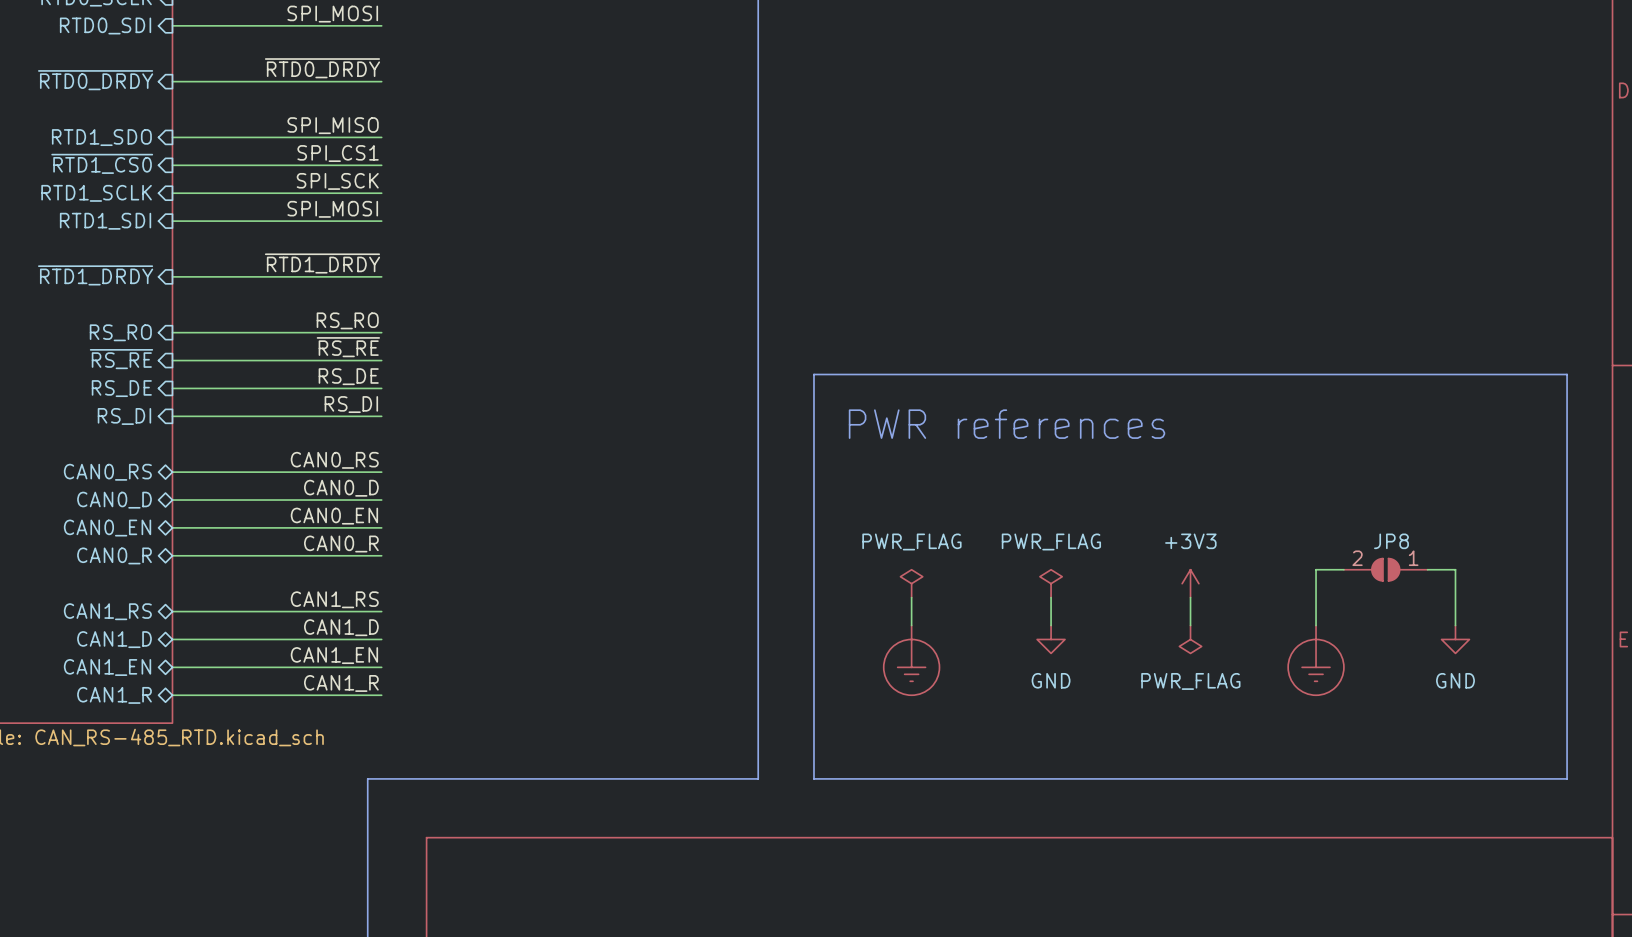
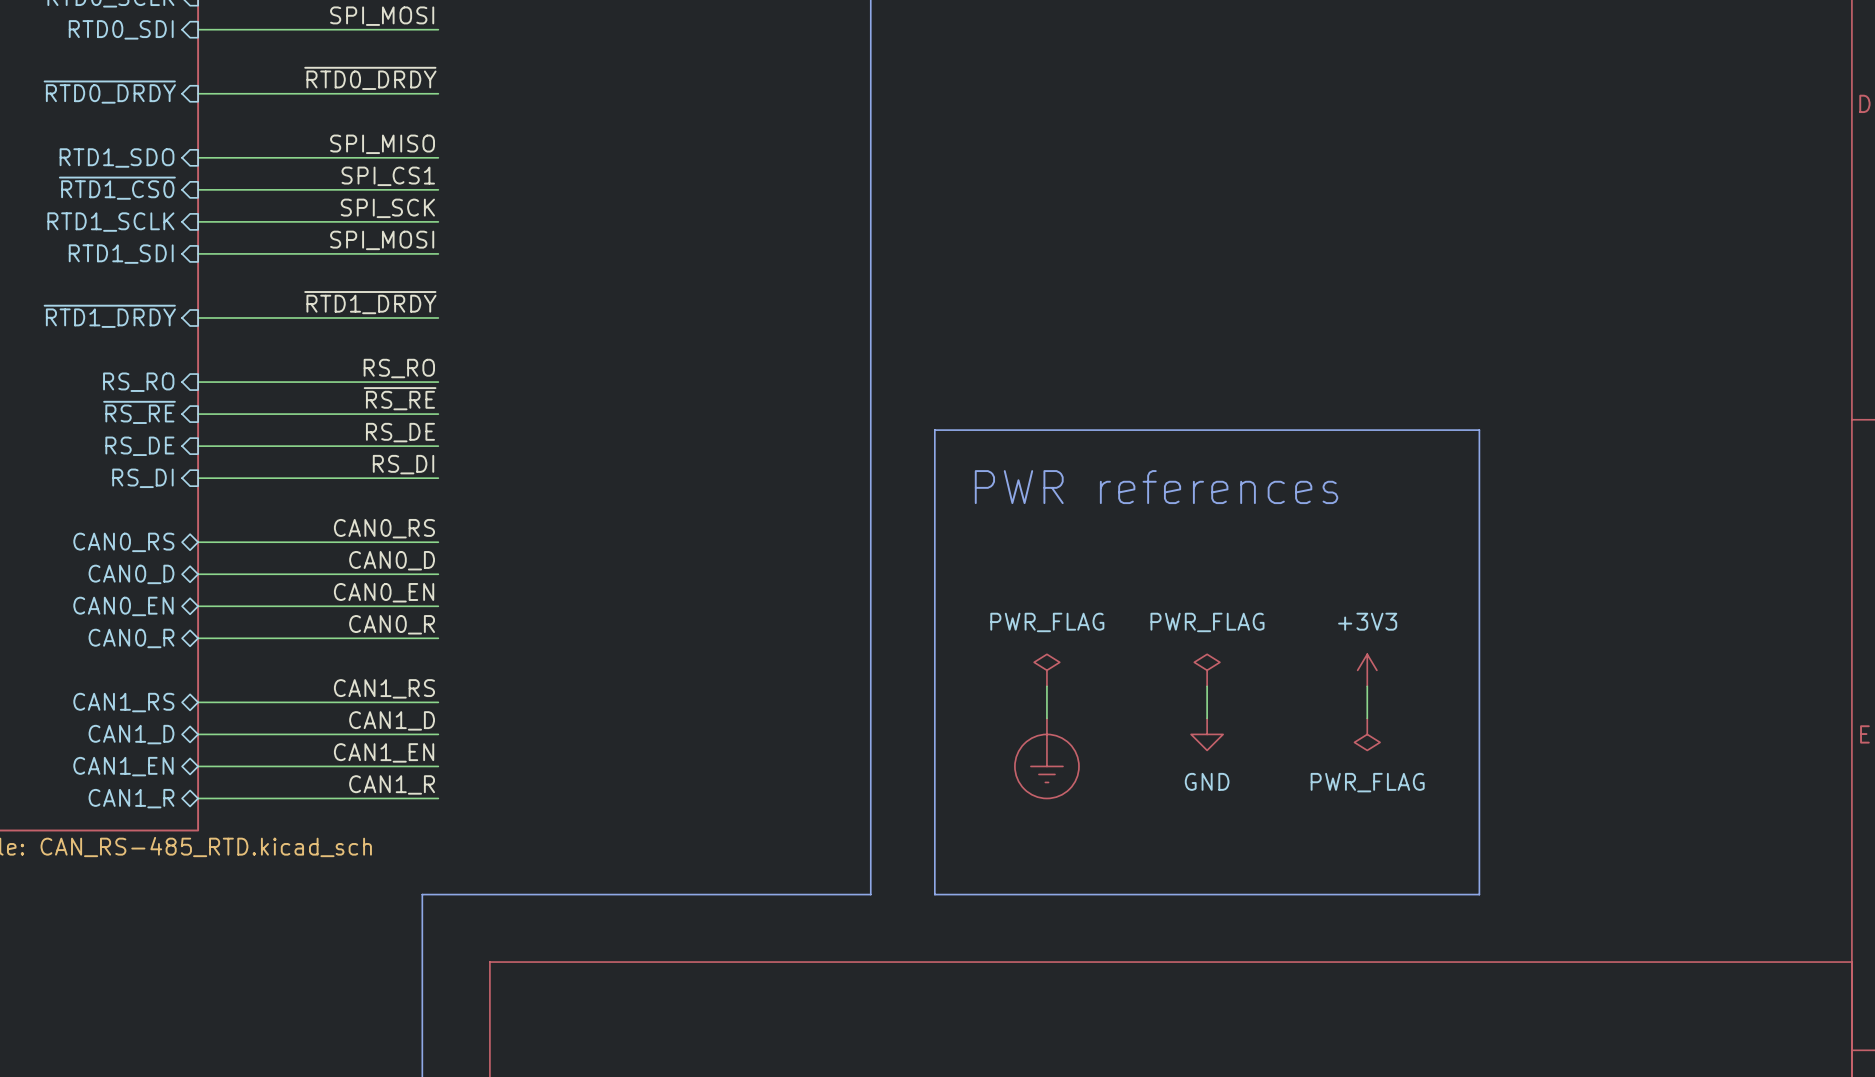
line: (1288, 374) (1567, 374) (1567, 778) (1288, 778) -> (1479, 430) (1479, 894)
wire: (1343, 569) (1316, 569) (1316, 625) -> none
JP8: (1385, 569) -> none
wire: (1427, 569) (1455, 569) (1455, 625) -> none
power symbol: GND (1455, 639) -> none
power symbol: (1316, 660) -> none

